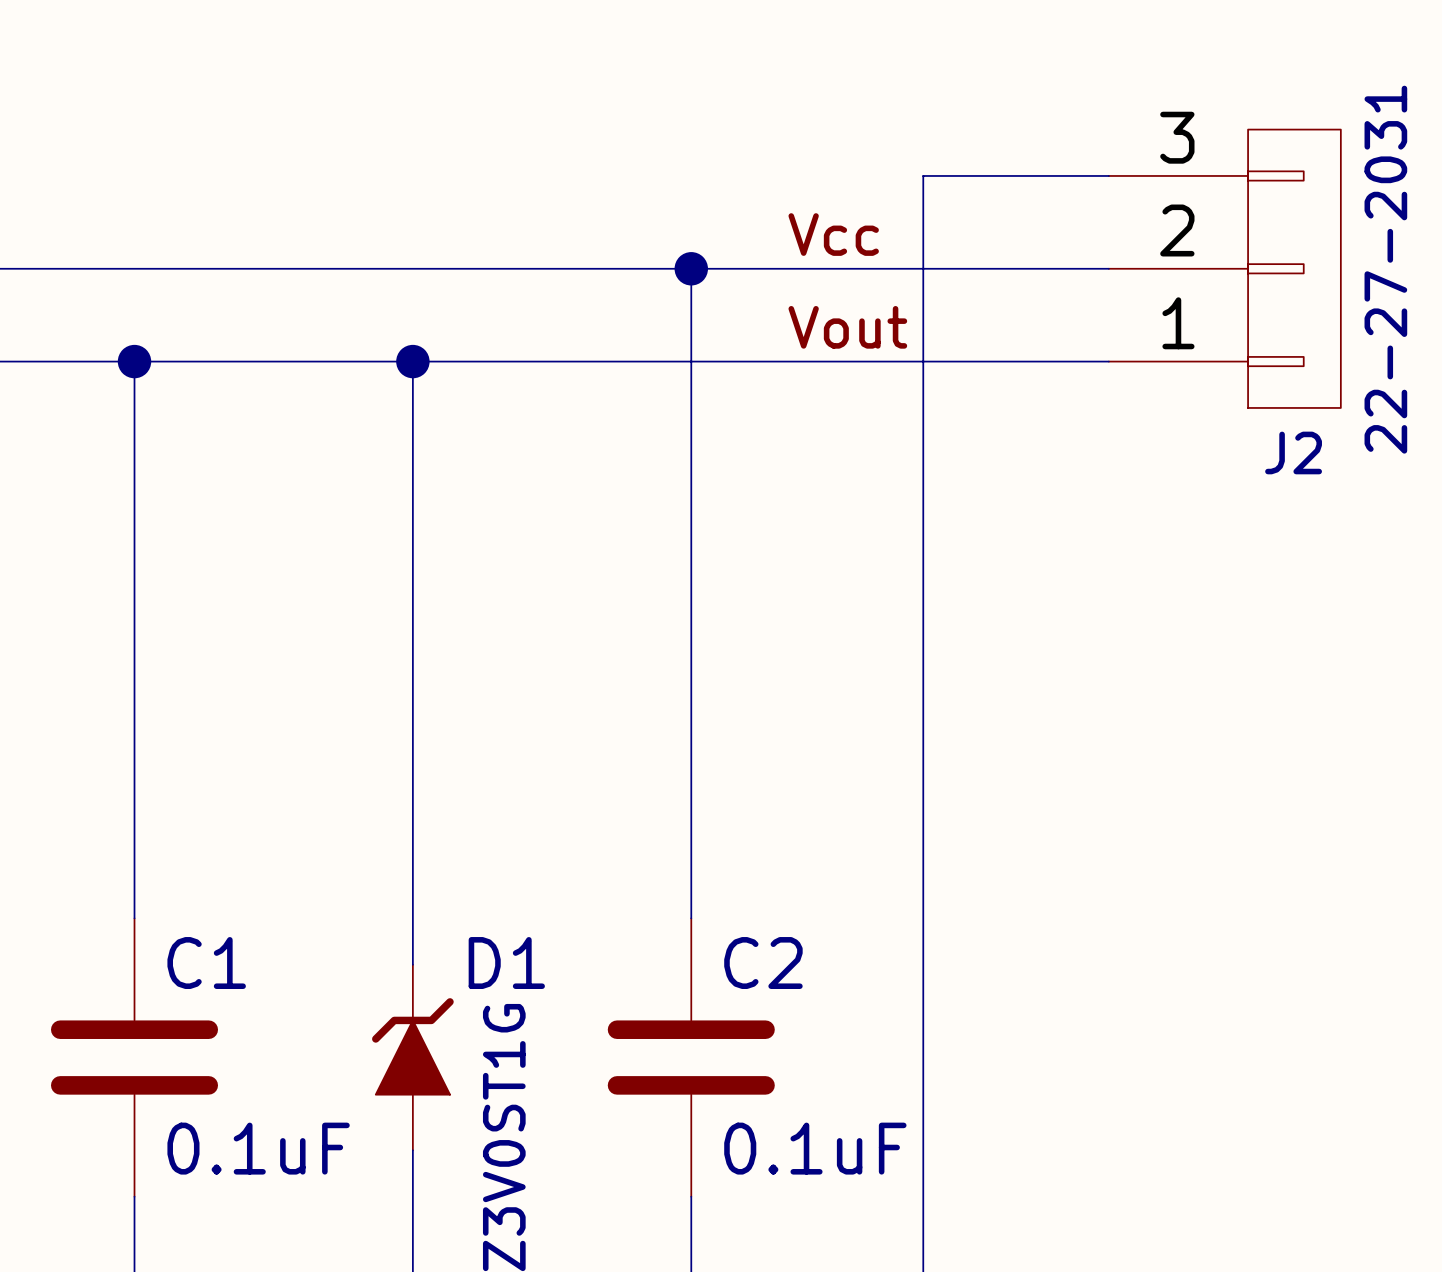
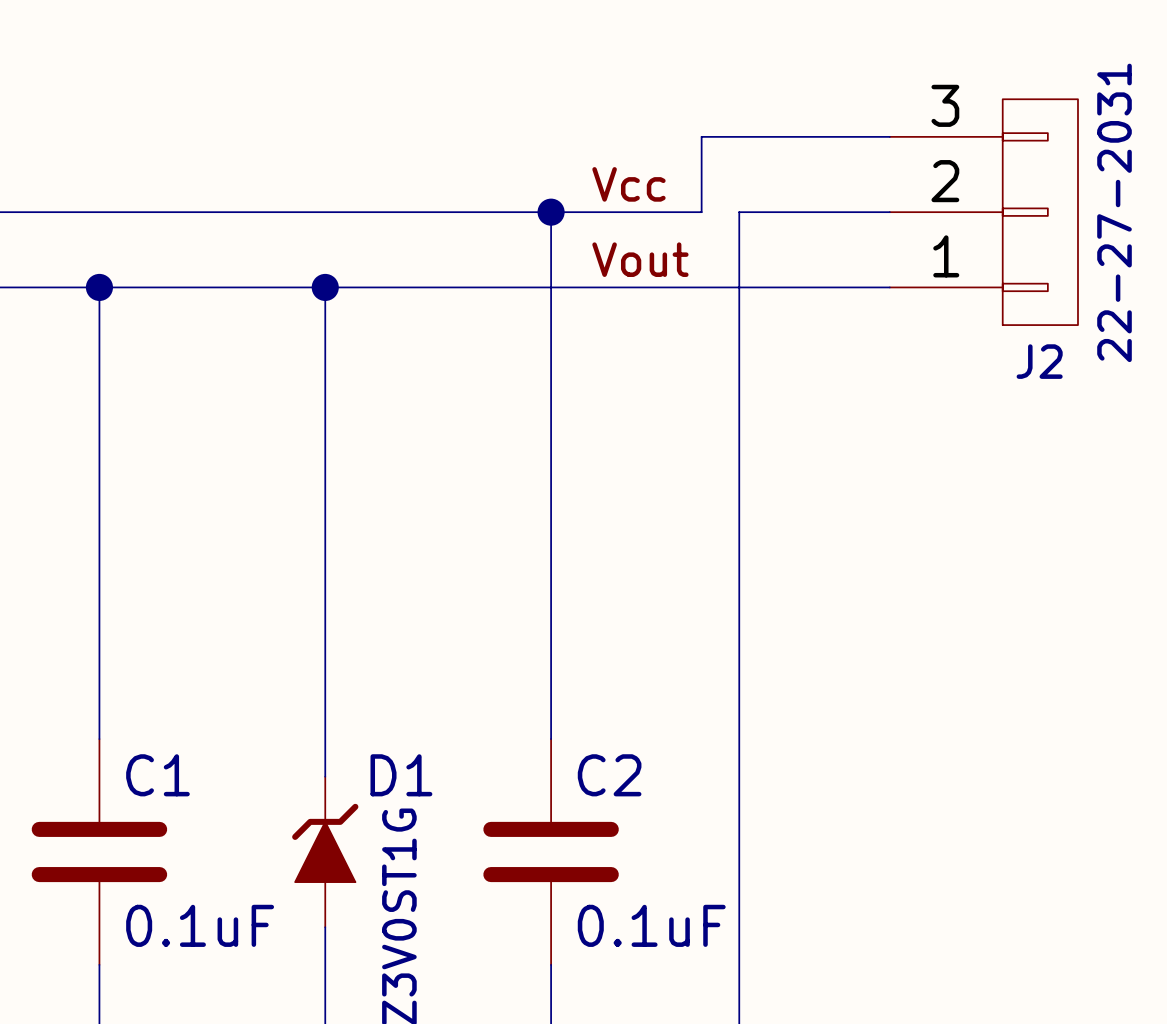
wire: (923, 175) (923, 268) (876, 268) -> (739, 136) (701, 136) (701, 212)
label position: Vcc (833, 234) -> Vcc (628, 184)
label position: Vout (847, 327) -> Vout (640, 259)

